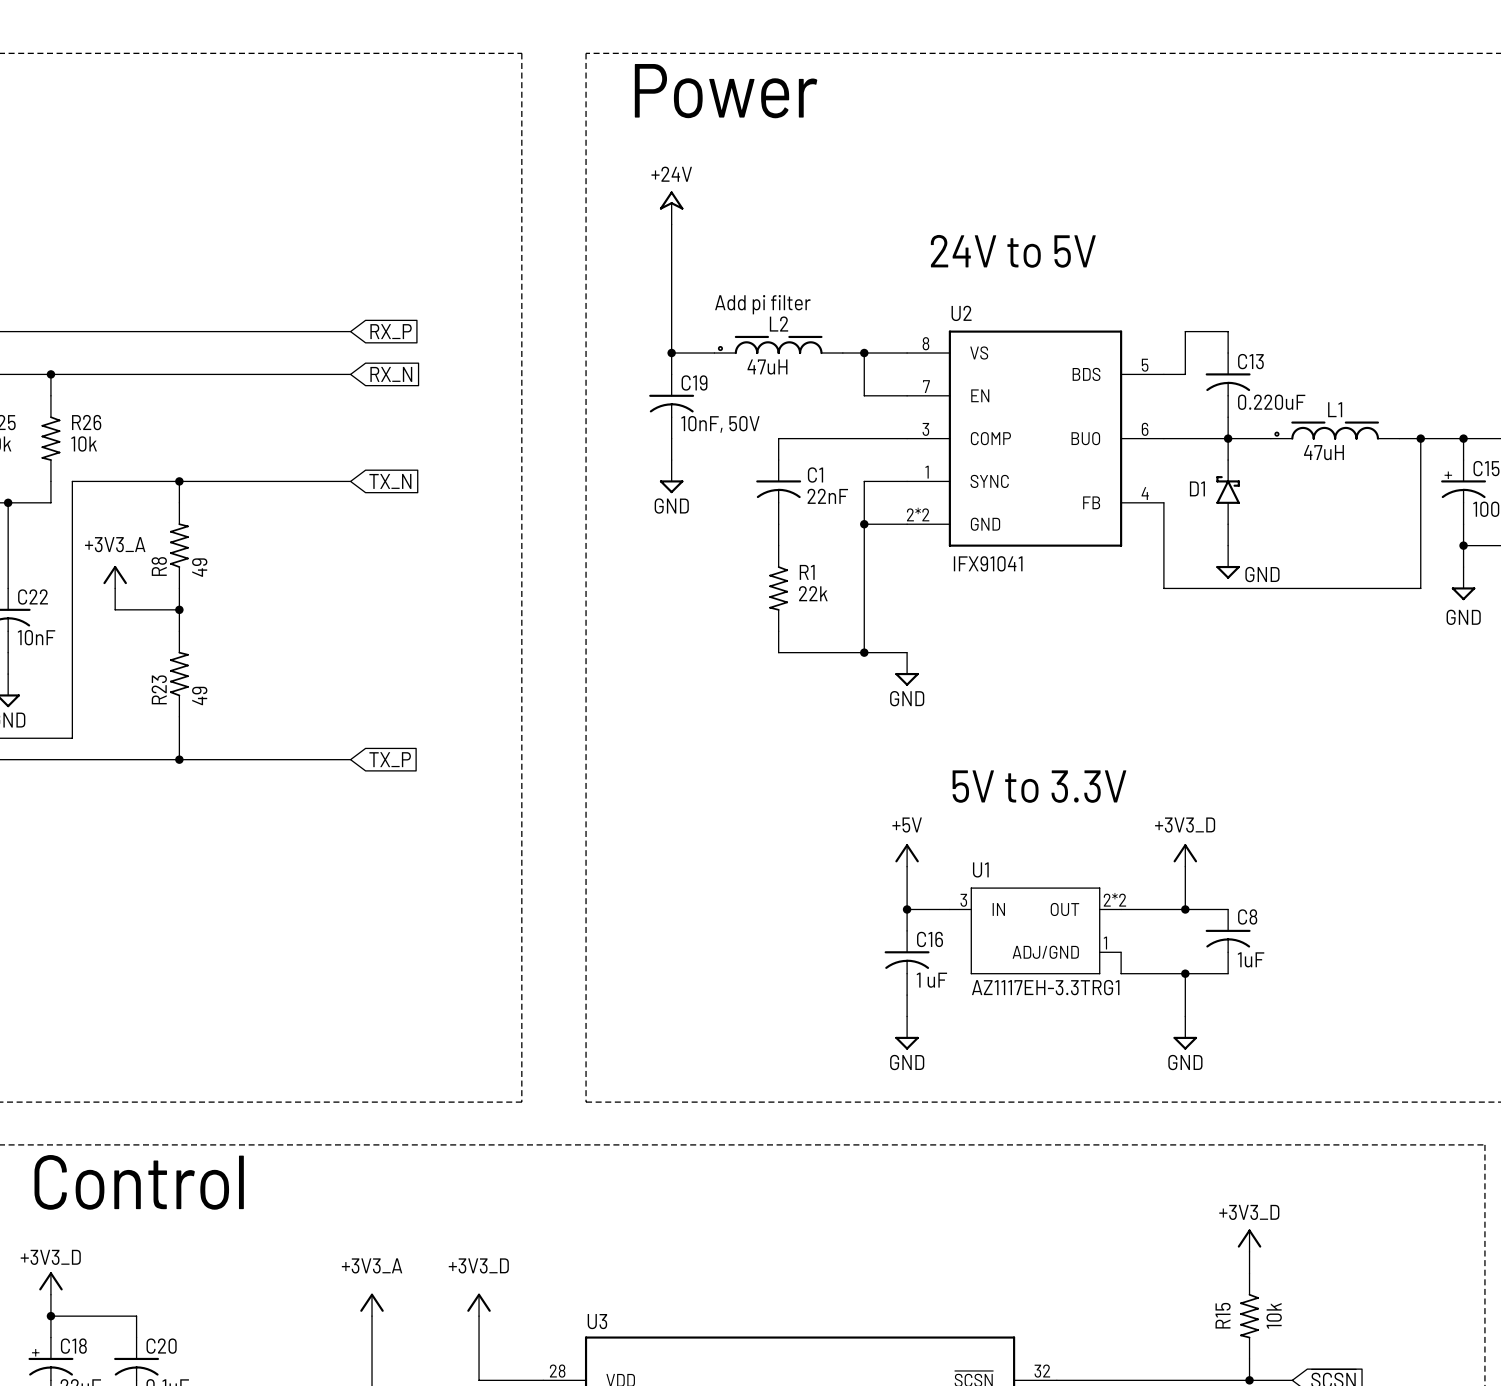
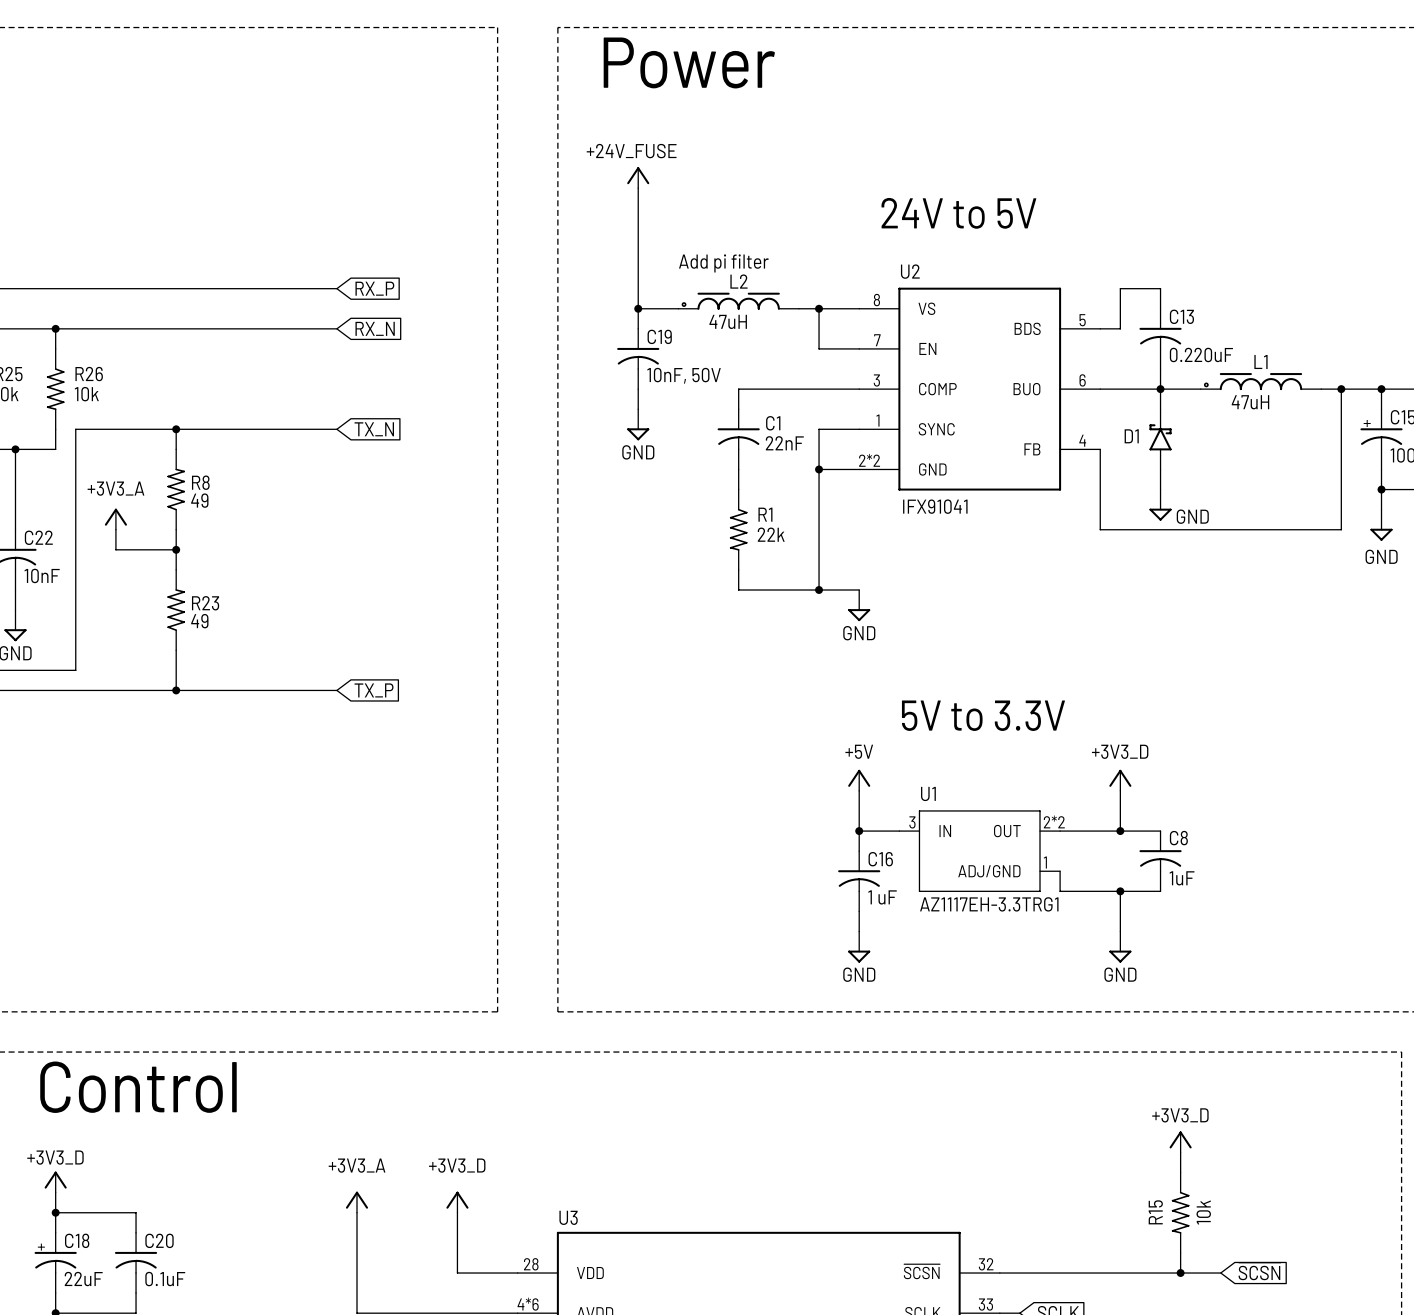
power symbol: +24V (671, 208) -> +24V_FUSE (638, 177)
R8 name rotation: 0° (159, 566) -> 90° clockwise (200, 482)
R8 name position: R8 (159, 566) -> R8 (200, 482)
R8 value rotation: 0° (199, 567) -> 90° clockwise (199, 500)
R23 name rotation: 0° (159, 689) -> 90° clockwise (205, 603)
R23 name position: R23 (159, 689) -> R23 (205, 603)
R23 value rotation: 0° (199, 695) -> 90° clockwise (199, 621)

